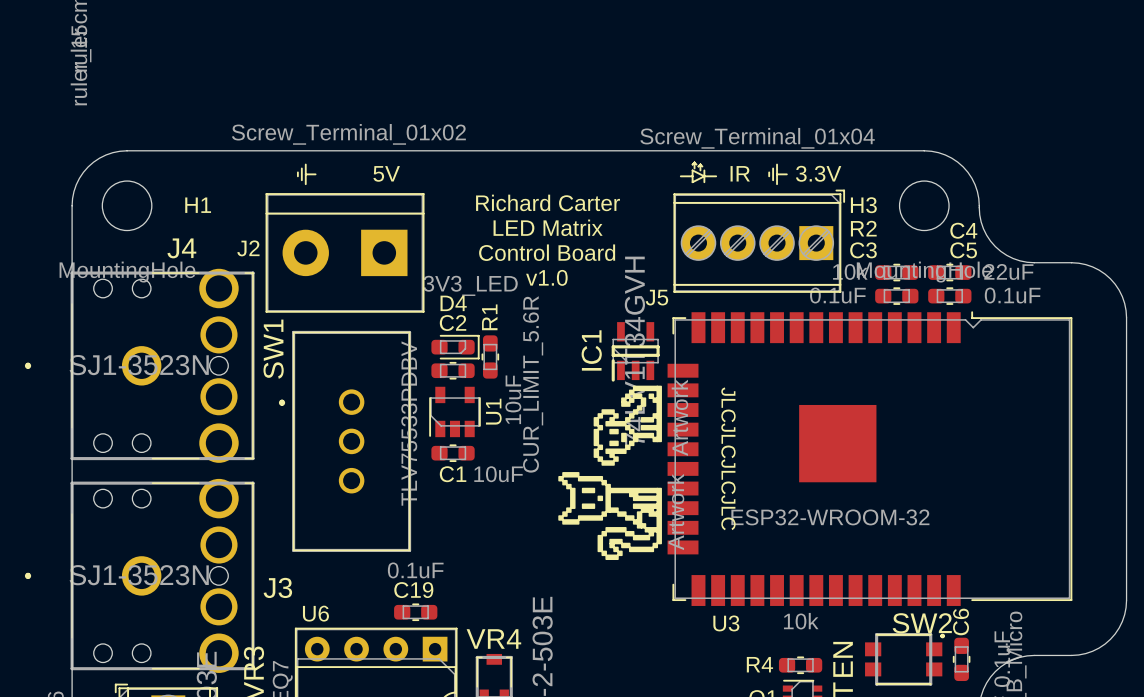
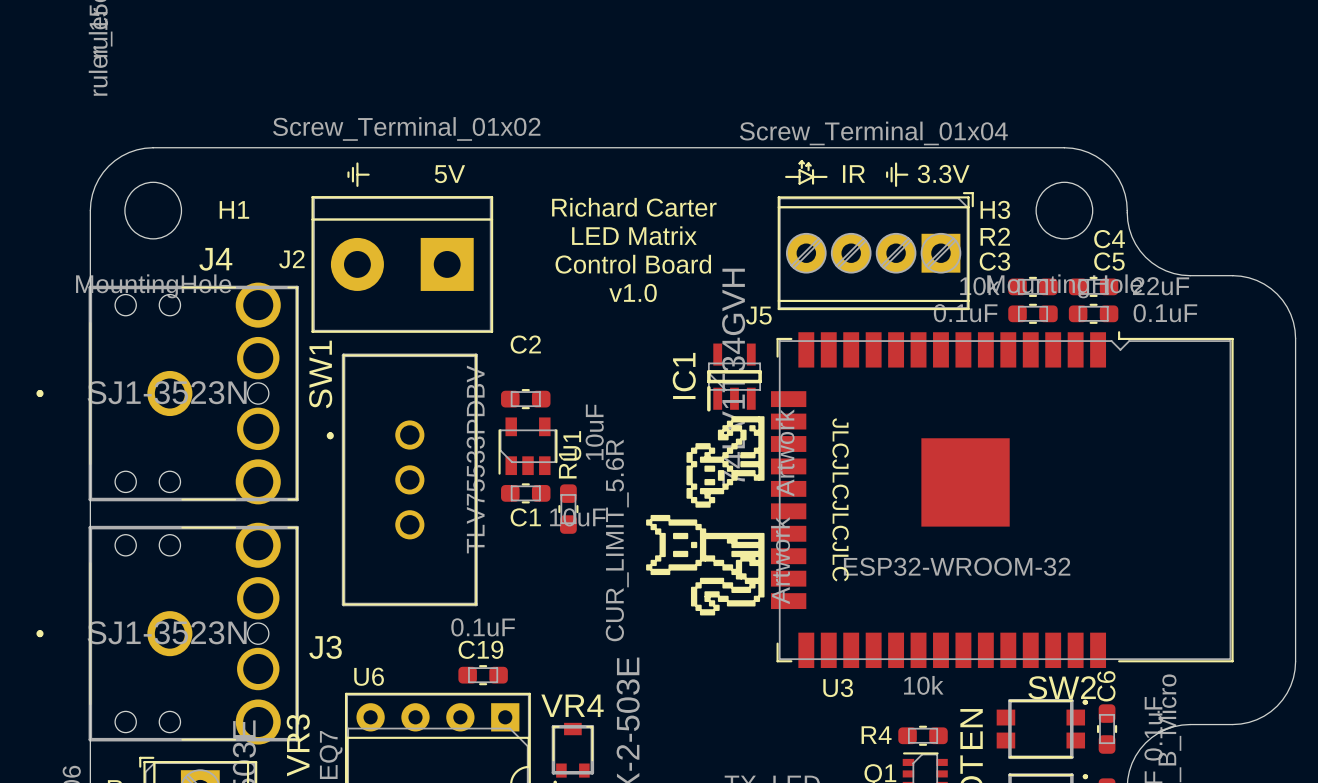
D4: 3V3_LED (455, 347) -> none
R1 position: (490, 356) -> (568, 509)

